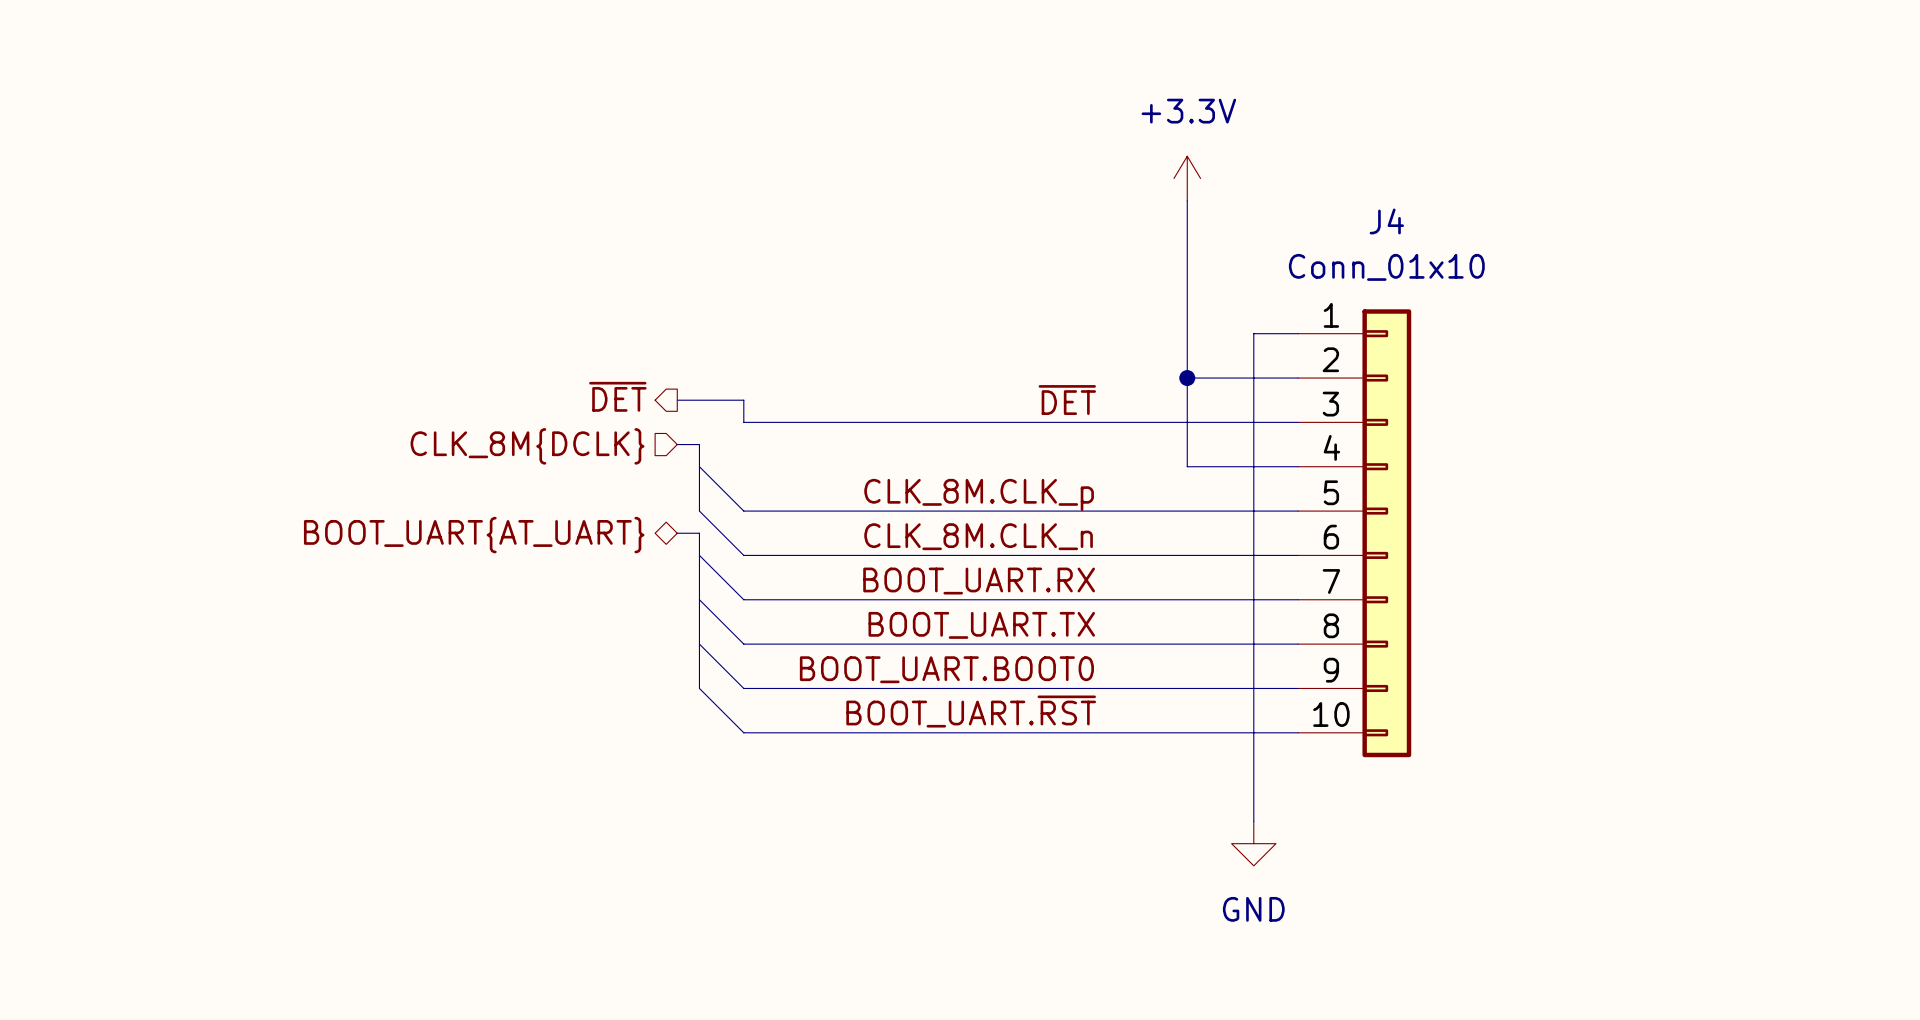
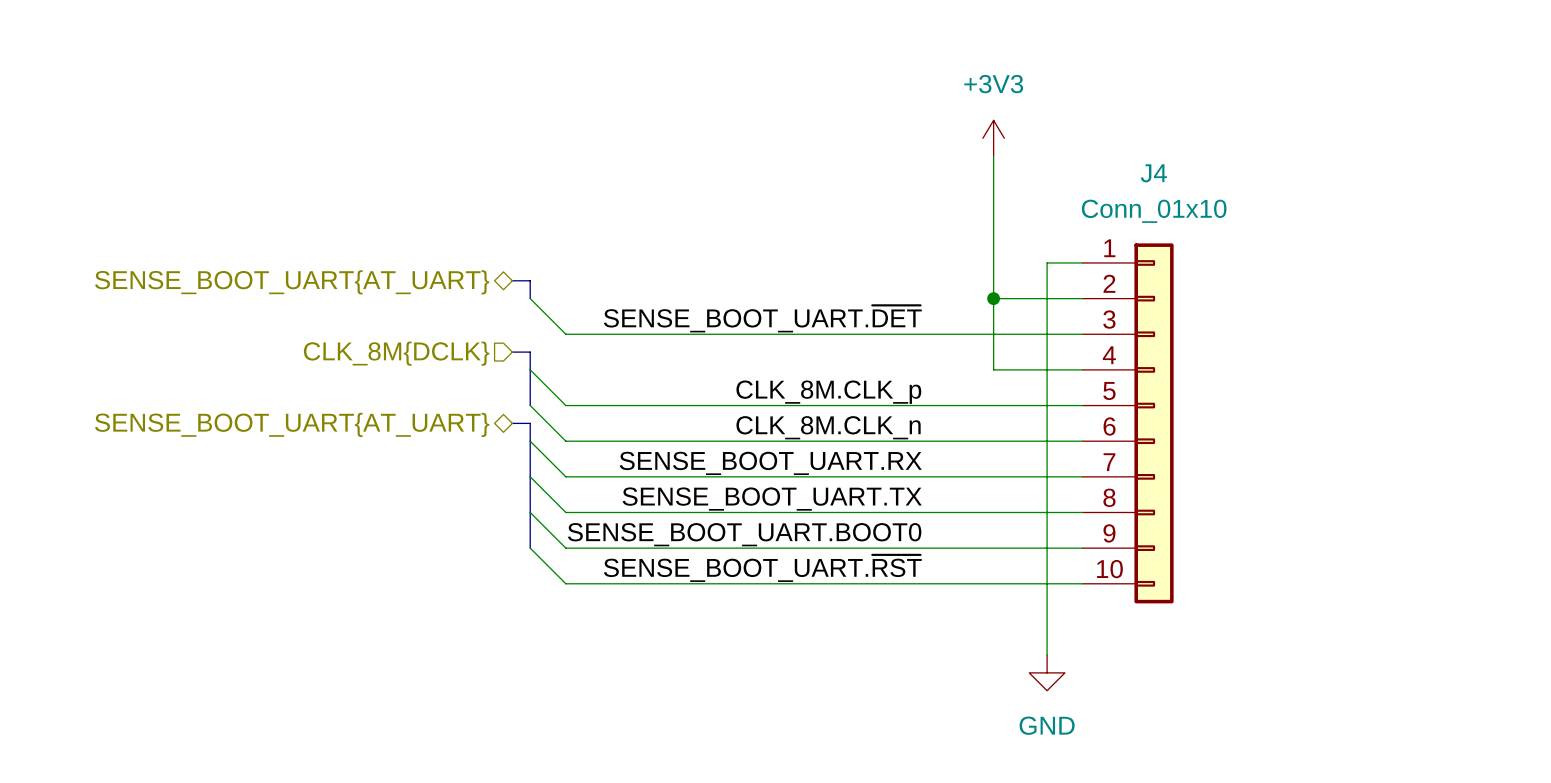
power symbol: +3.3V (1187, 178) -> +3V3 (993, 138)
bus: none -> (512, 280) (530, 280) (530, 298)
hierarchical label: none -> SENSE_BOOT_UART{AT_UART} (292, 282)
hierarchical label: ~{DET} (617, 396) -> none
wire: (677, 400) (743, 400) (743, 422) -> (530, 298) (565, 334) (637, 334)
label: ~{DET} (1067, 400) -> SENSE_BOOT_UART.~{DET} (762, 318)
bus: (677, 444) (699, 444) (699, 511) -> (512, 352) (530, 352) (530, 405)
hierarchical label position: CLK_8M{DCLK} (527, 446) -> CLK_8M{DCLK} (396, 353)
wire: (699, 466) (743, 511) -> (530, 369) (565, 405) (637, 405)
wire: (699, 511) (743, 555) -> (530, 405) (565, 441) (637, 441)
bus: (677, 533) (699, 533) (699, 688) -> (512, 423) (530, 423) (530, 548)
hierarchical label: BOOT_UART{AT_UART} (474, 535) -> SENSE_BOOT_UART{AT_UART} (292, 424)
wire: (699, 555) (743, 599) -> (530, 441) (565, 476) (637, 476)
label: BOOT_UART.RX (979, 581) -> SENSE_BOOT_UART.RX (770, 463)
wire: (699, 599) (743, 644) -> (530, 476) (565, 512) (637, 512)
label: BOOT_UART.TX (981, 625) -> SENSE_BOOT_UART.TX (772, 499)
wire: (699, 644) (743, 688) -> (530, 512) (565, 548) (637, 548)
label: BOOT_UART.BOOT0 (946, 669) -> SENSE_BOOT_UART.BOOT0 (744, 534)
wire: (699, 688) (743, 732) -> (530, 548) (565, 583) (637, 583)
label: BOOT_UART.~{RST} (971, 711) -> SENSE_BOOT_UART.~{RST} (762, 568)

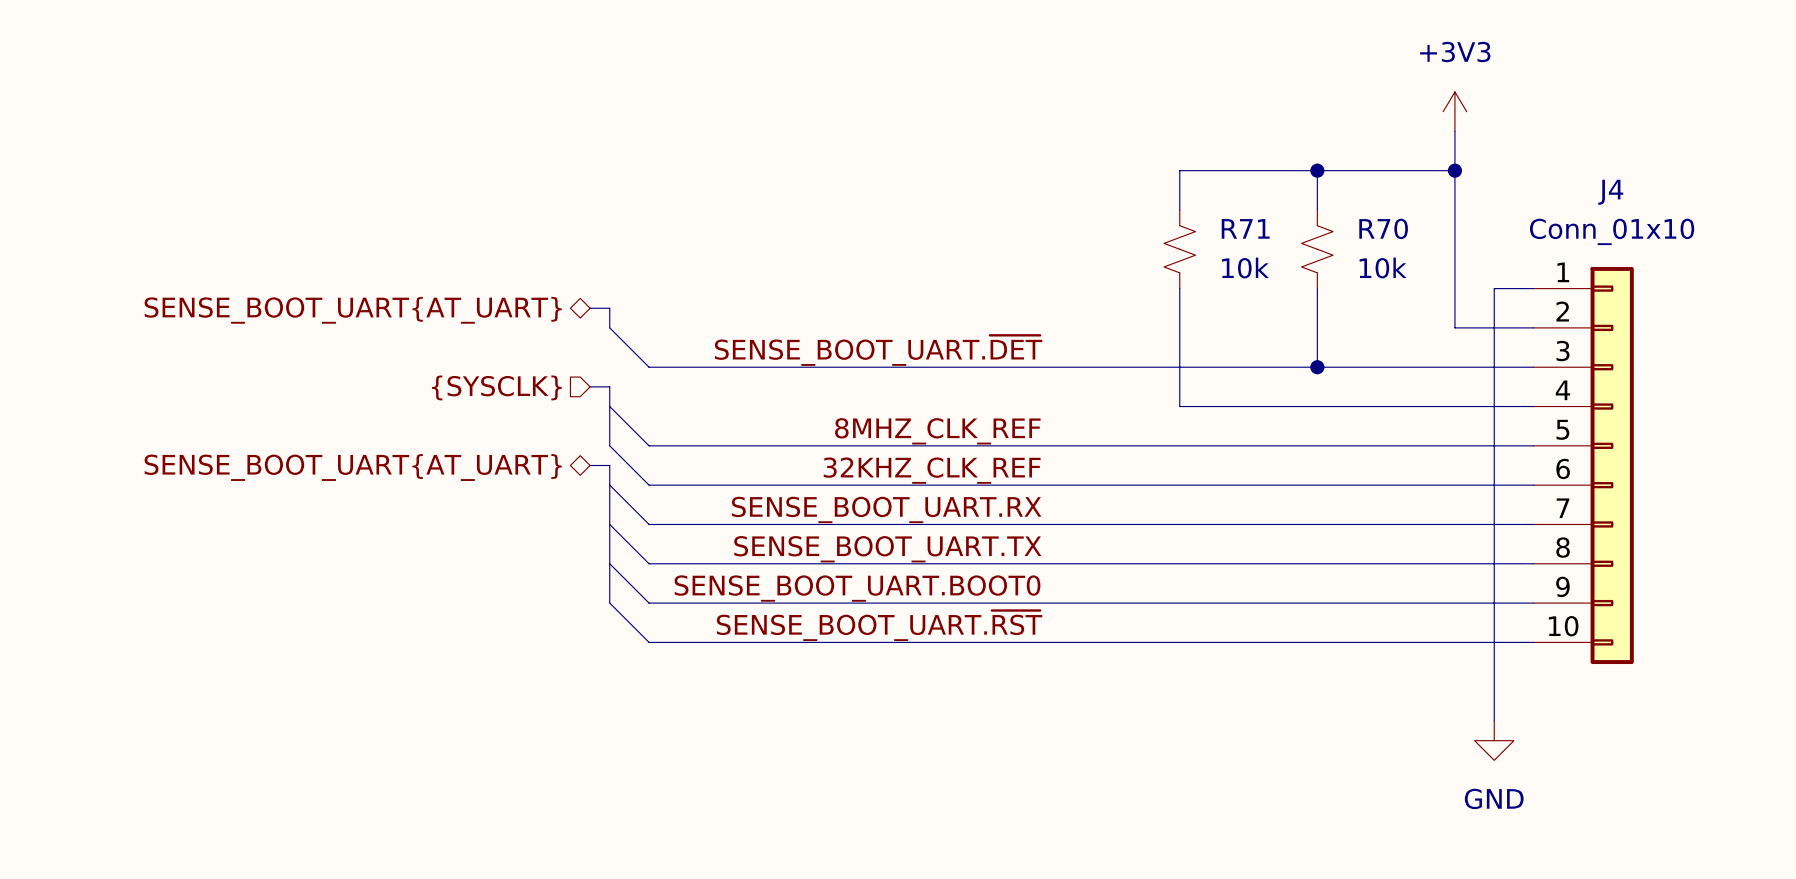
wire: none -> (1454, 131) (1454, 327) (1533, 327)
power symbol position: +3V3 (993, 138) -> +3V3 (1454, 111)
wire: (993, 156) (993, 369) (1047, 369) (1047, 655) -> none
wire: none -> (1317, 170) (1317, 209)
junction: none -> (1317, 170)
wire: none -> (1454, 170) (1179, 170) (1179, 209)
junction: none -> (1454, 170)
R71: none -> 10k (1179, 249)
R70: none -> 10k (1317, 249)
wire: (1047, 262) (1082, 262) -> none
wire: none -> (1533, 288) (1494, 288) (1494, 721)
wire: (993, 298) (1082, 298) -> none
junction: (993, 298) -> none
wire: none -> (1219, 367) (1533, 367)
junction: none -> (1317, 367)
hierarchical label: CLK_8M{DCLK} (396, 353) -> {SYSCLK} (496, 387)
wire: none -> (1219, 406) (1533, 406)
label: CLK_8M.CLK_p (828, 392) -> 8MHZ_CLK_REF (937, 431)
wire: none -> (1219, 445) (1533, 445)
J4 position: (1128, 423) -> (1583, 465)
label: CLK_8M.CLK_n (828, 427) -> 32KHZ_CLK_REF (932, 470)
wire: none -> (1219, 485) (1533, 485)
wire: none -> (1219, 524) (1533, 524)
wire: none -> (1219, 563) (1533, 563)
wire: none -> (1219, 603) (1533, 603)
wire: none -> (1219, 642) (1533, 642)
power symbol position: GND (1047, 672) -> GND (1494, 740)

